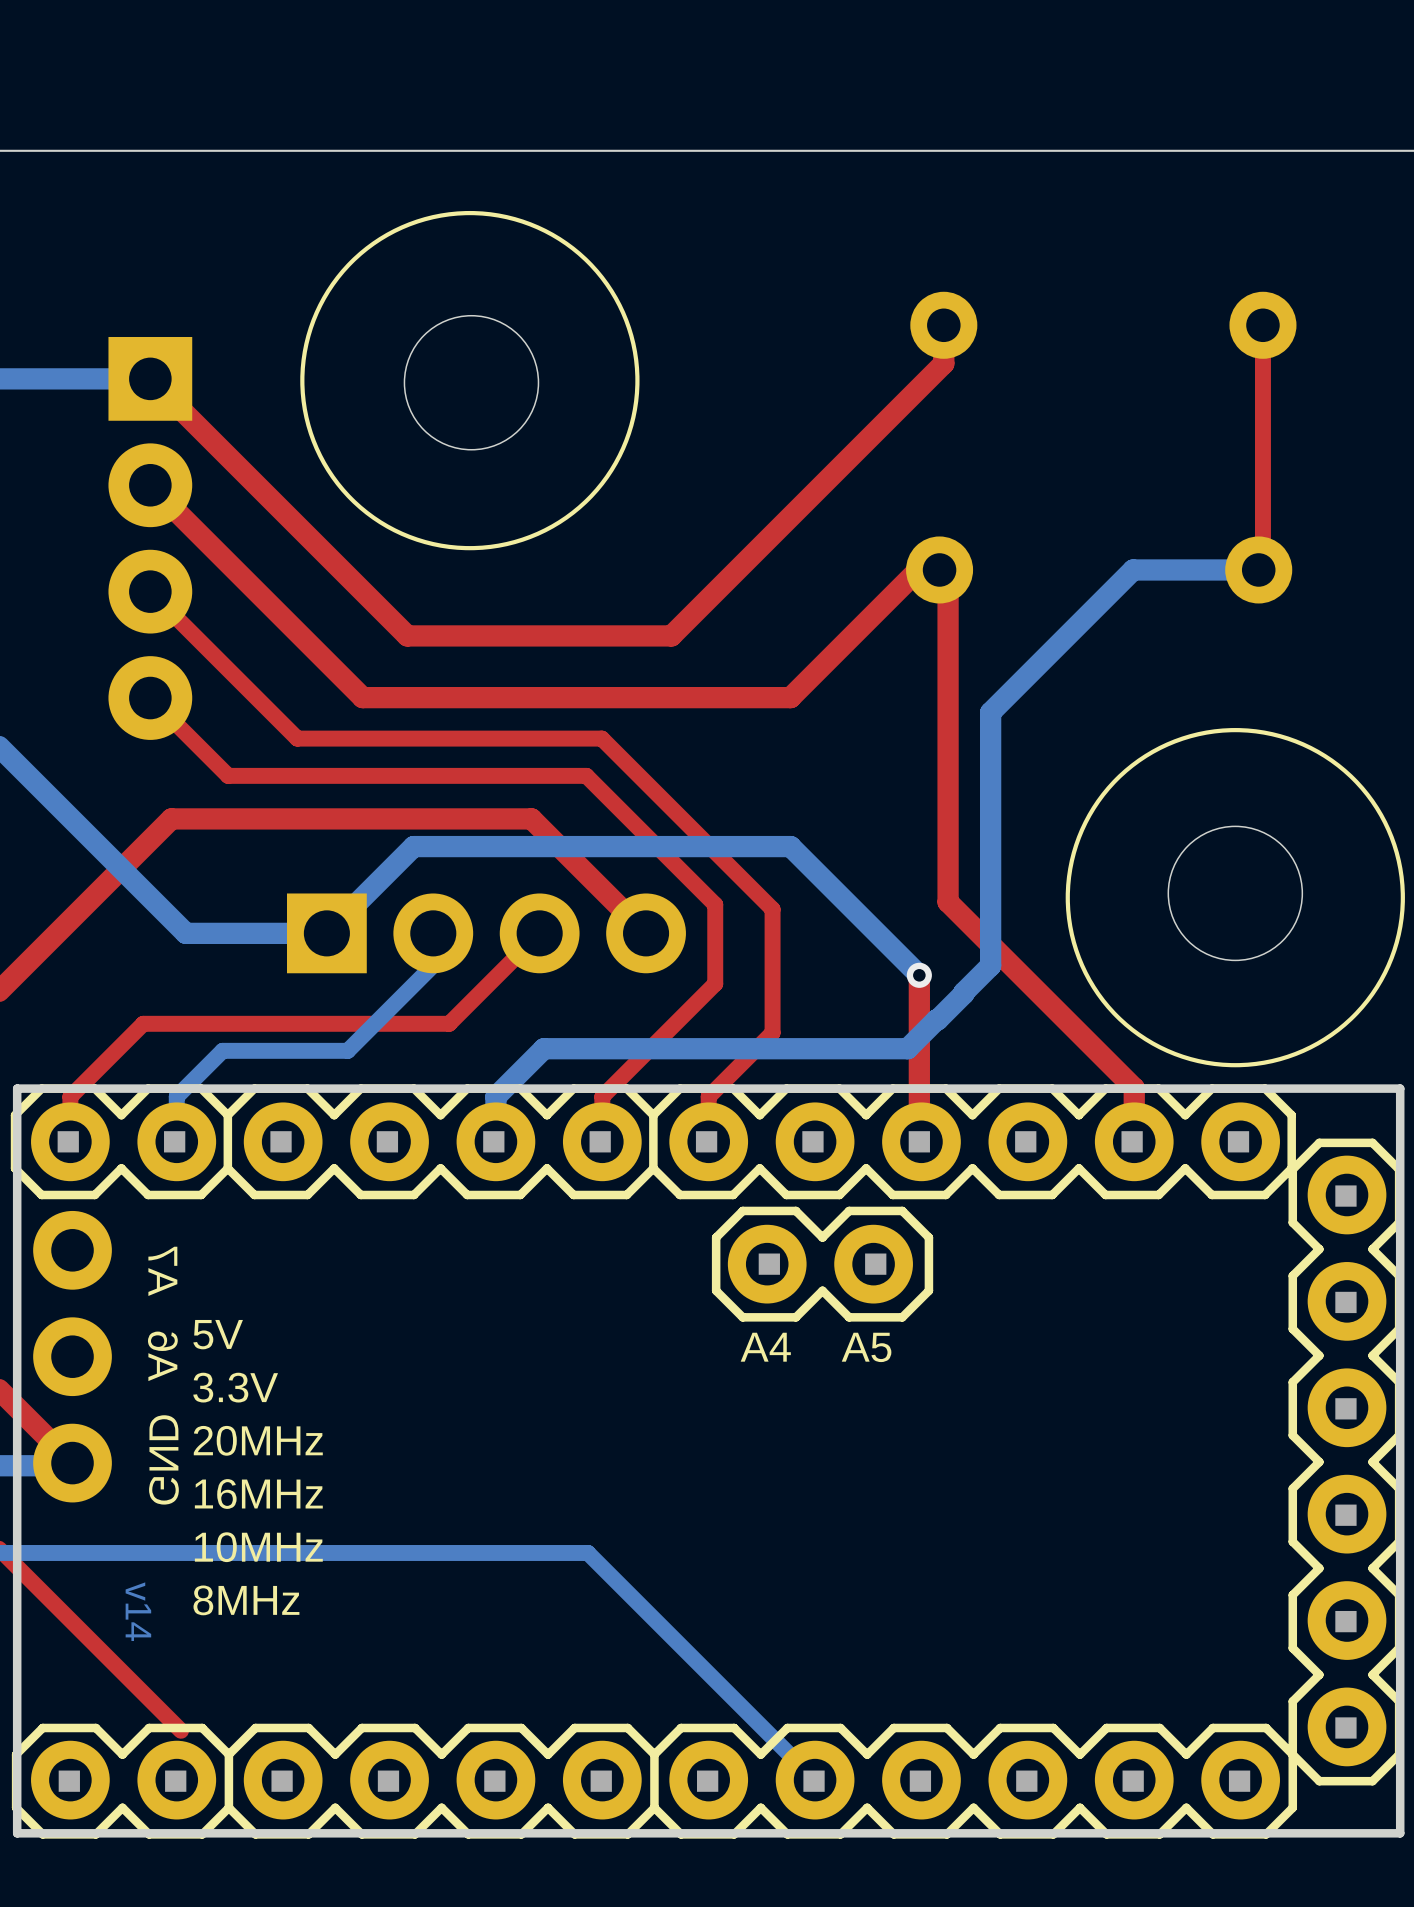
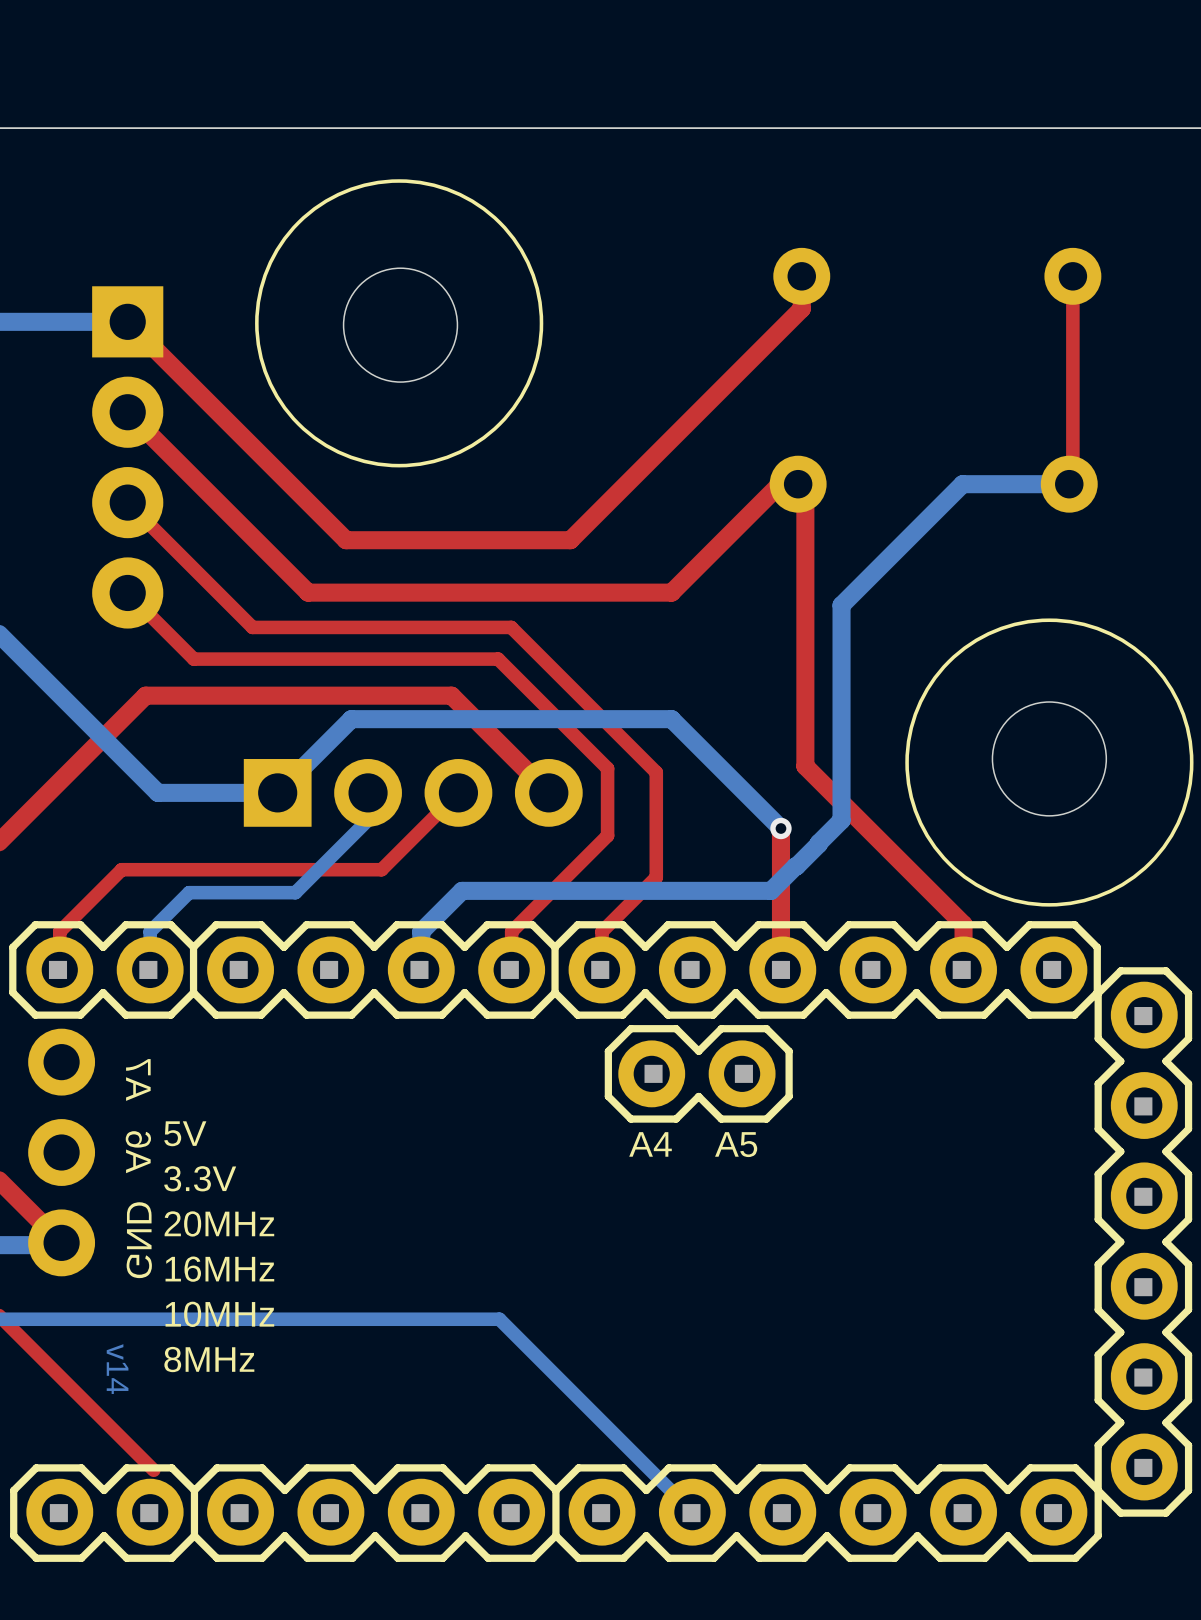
part footprint: [10, 1084, 1405, 1839] -> [9, 921, 1193, 1562]

